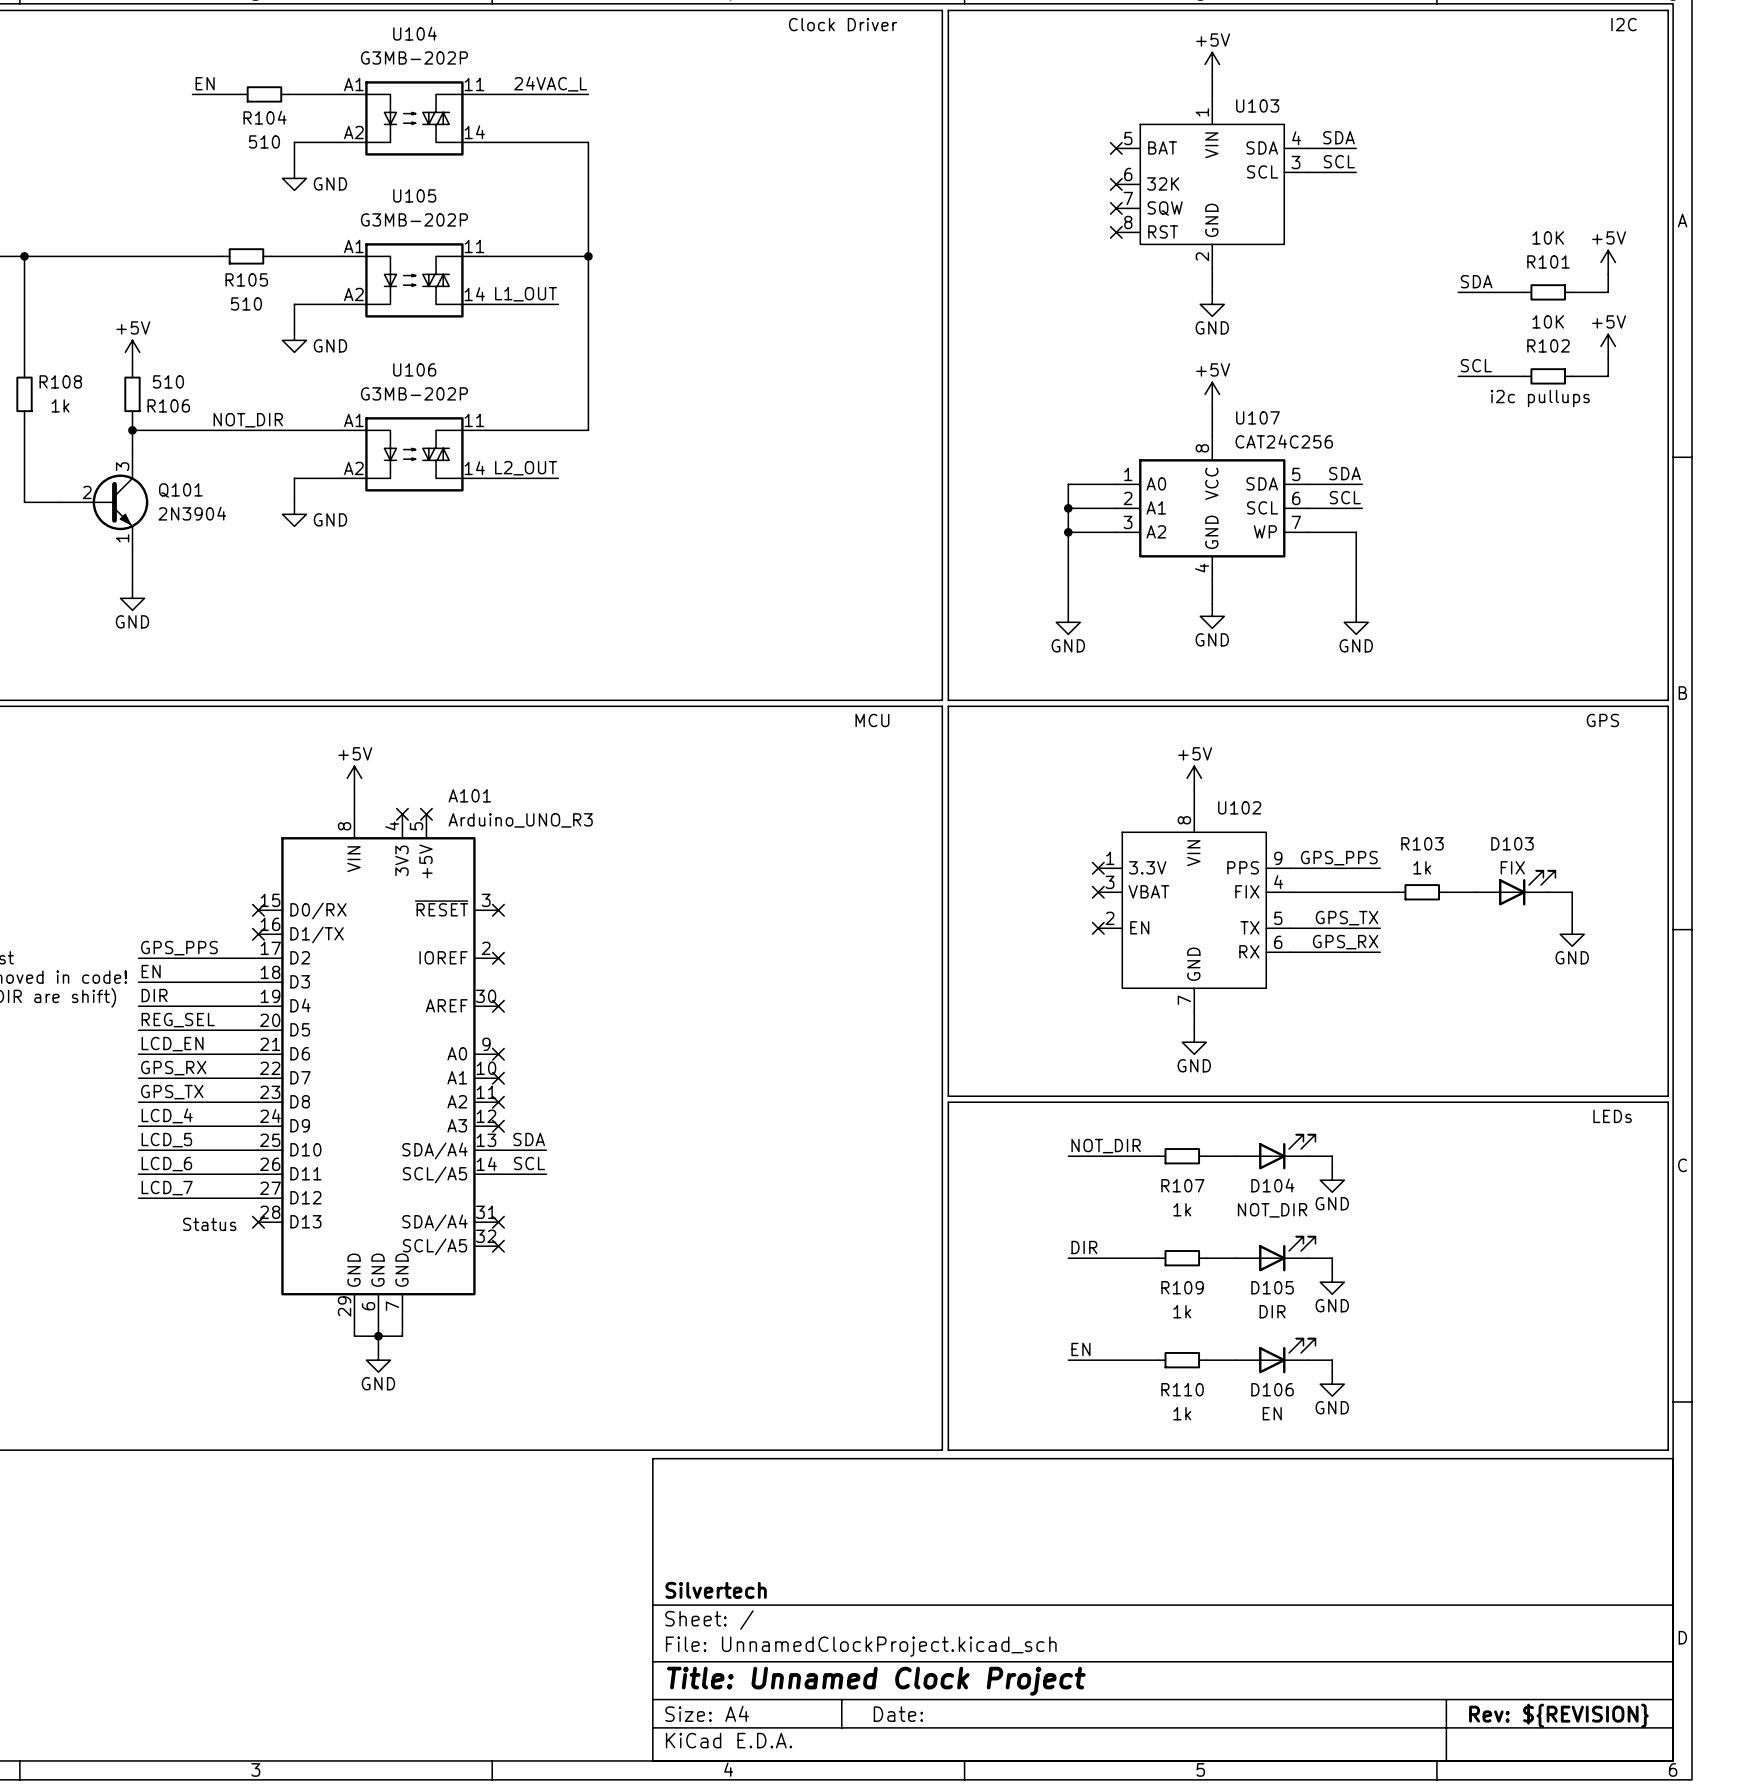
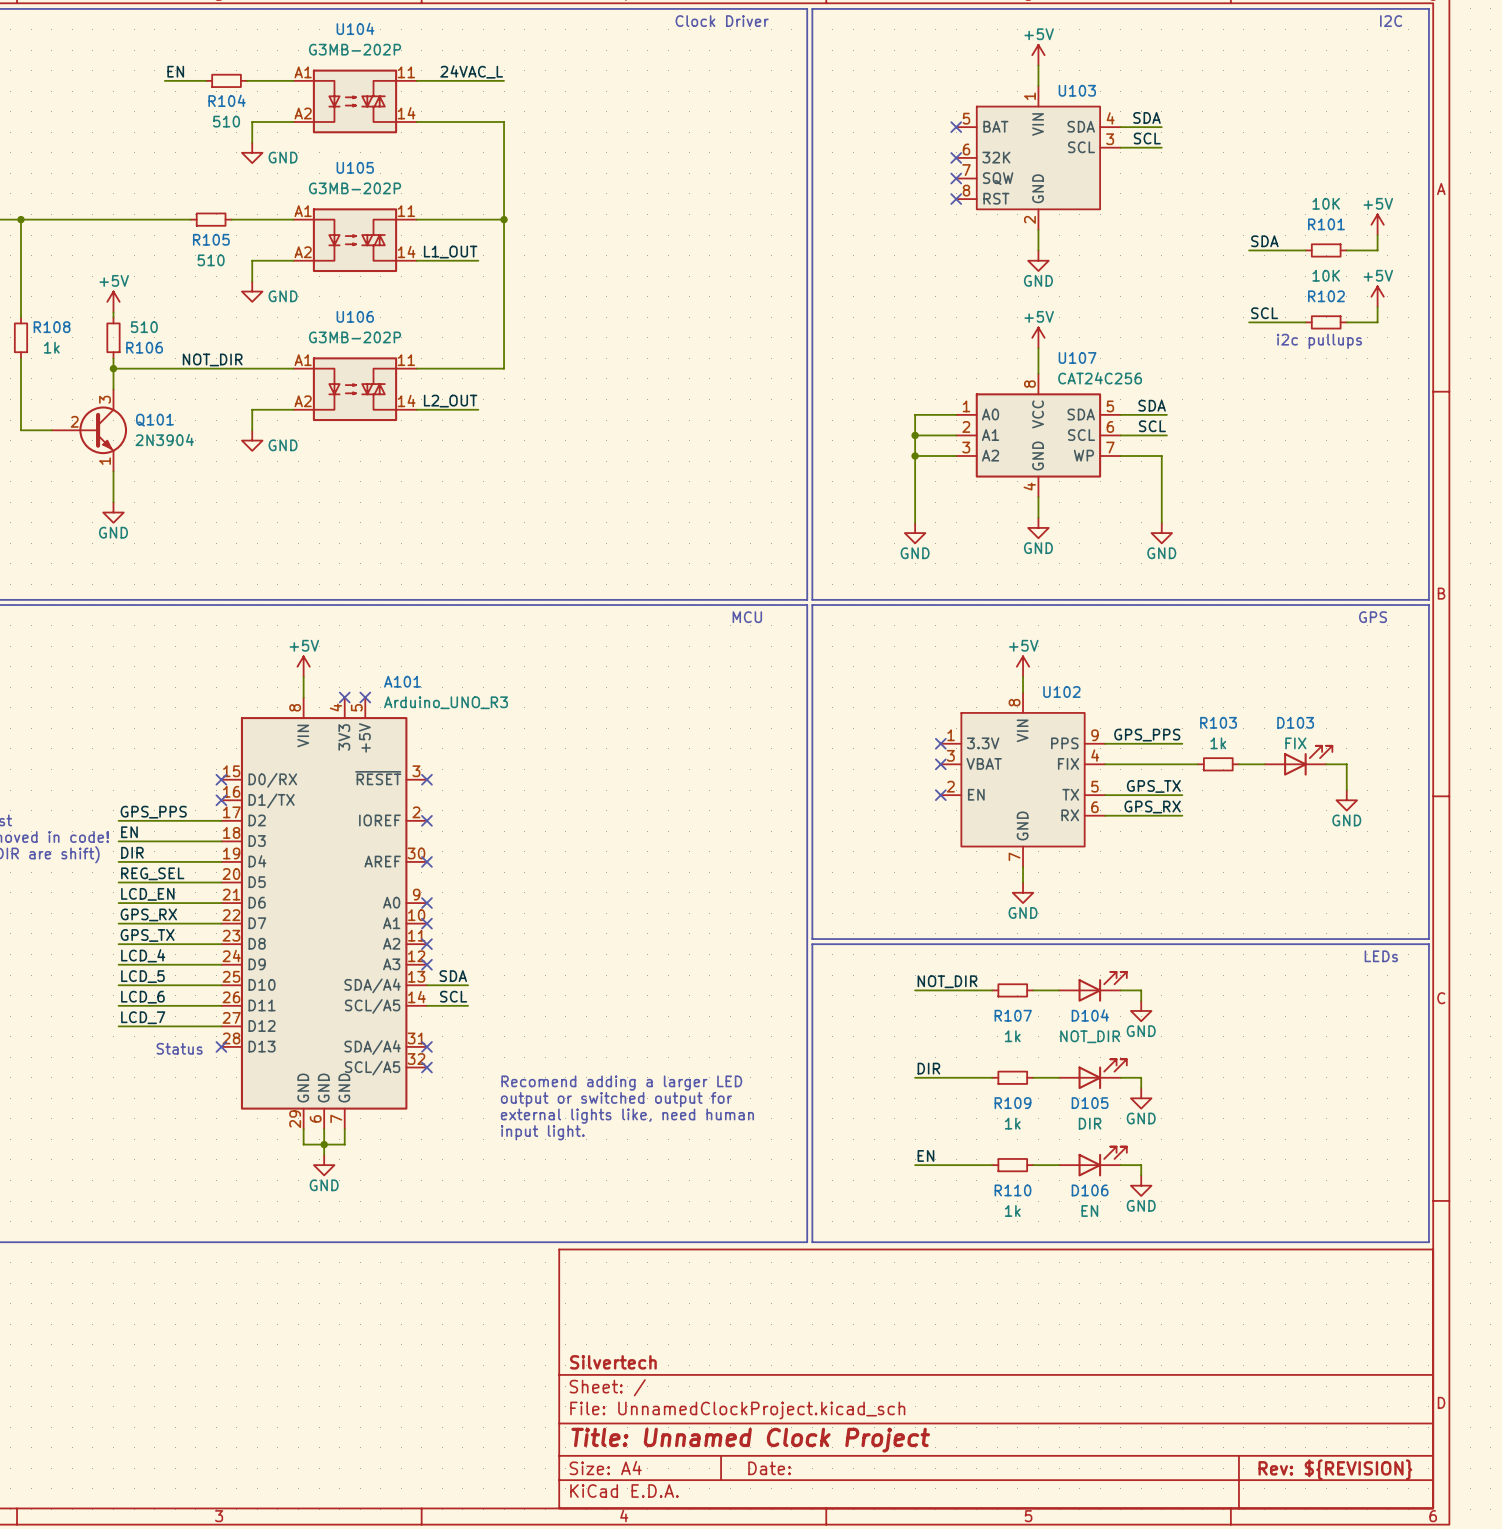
text: none -> Recomend adding a larger LED (621, 1083)
text: none -> output or switched output for (616, 1099)
text: none -> external lights like, need human (627, 1116)
text: none -> input light. (542, 1132)

